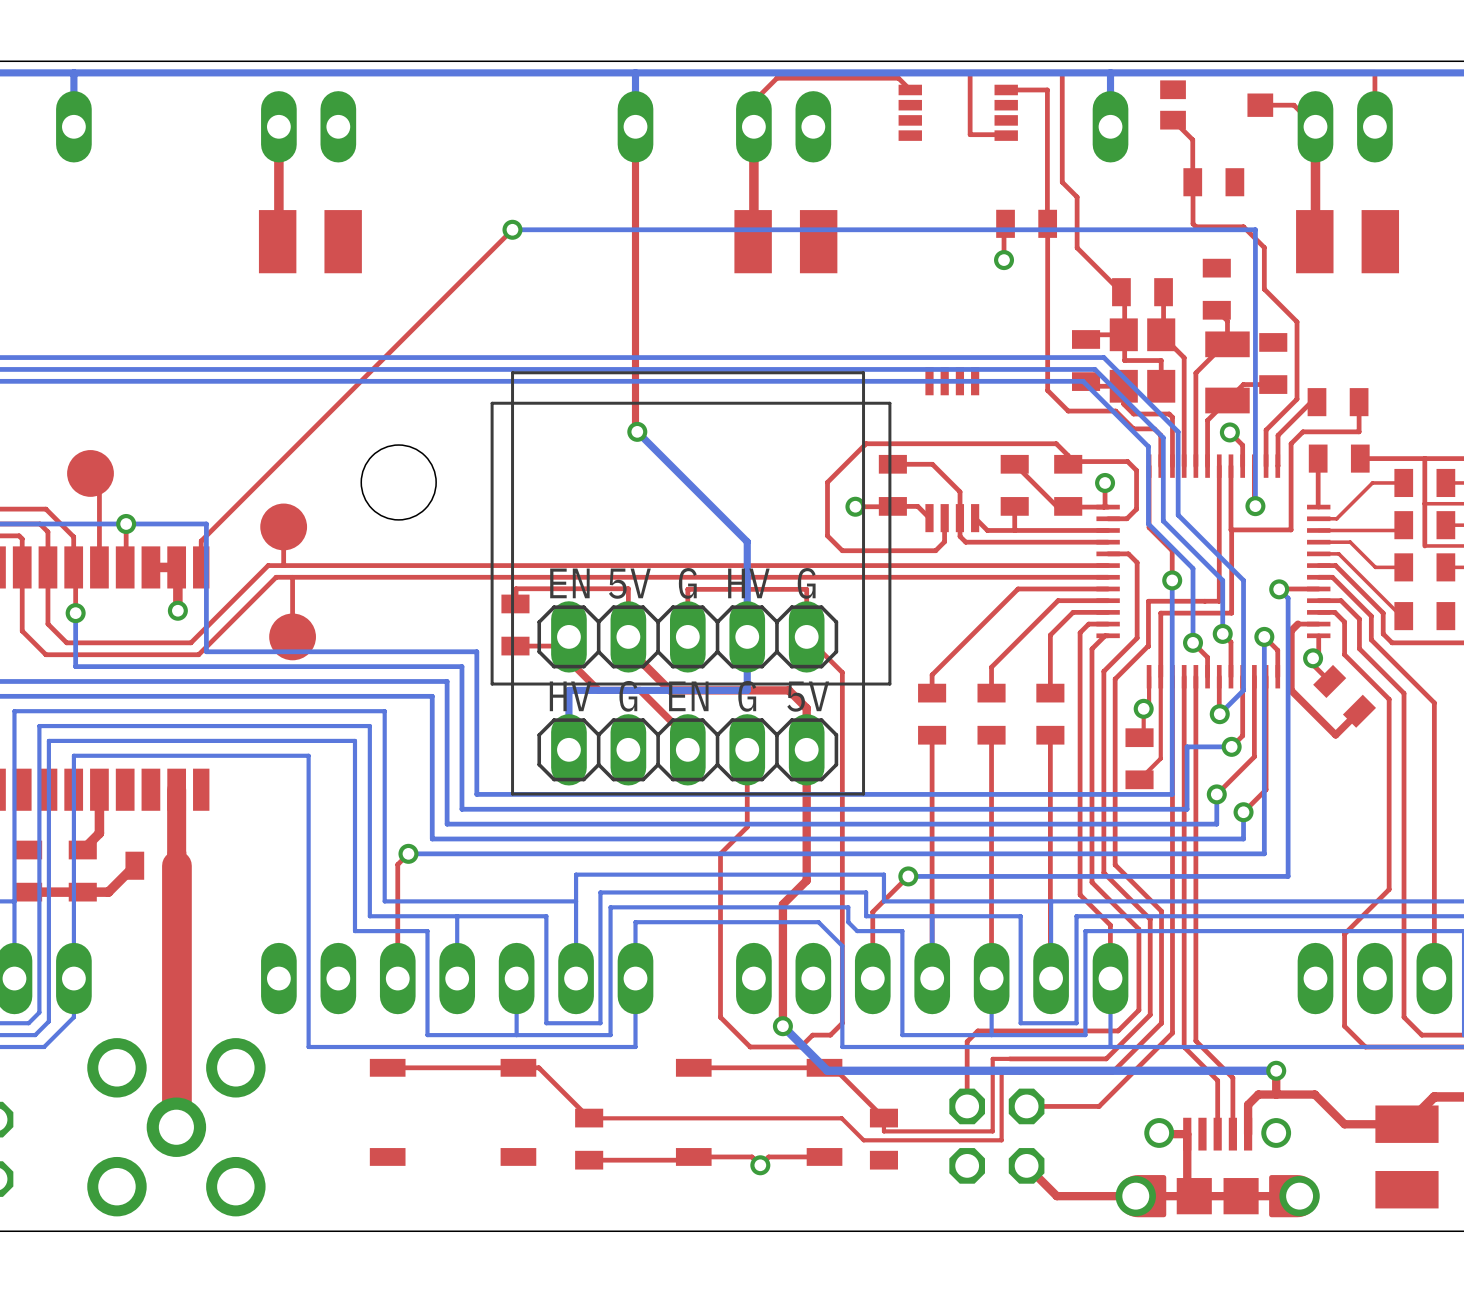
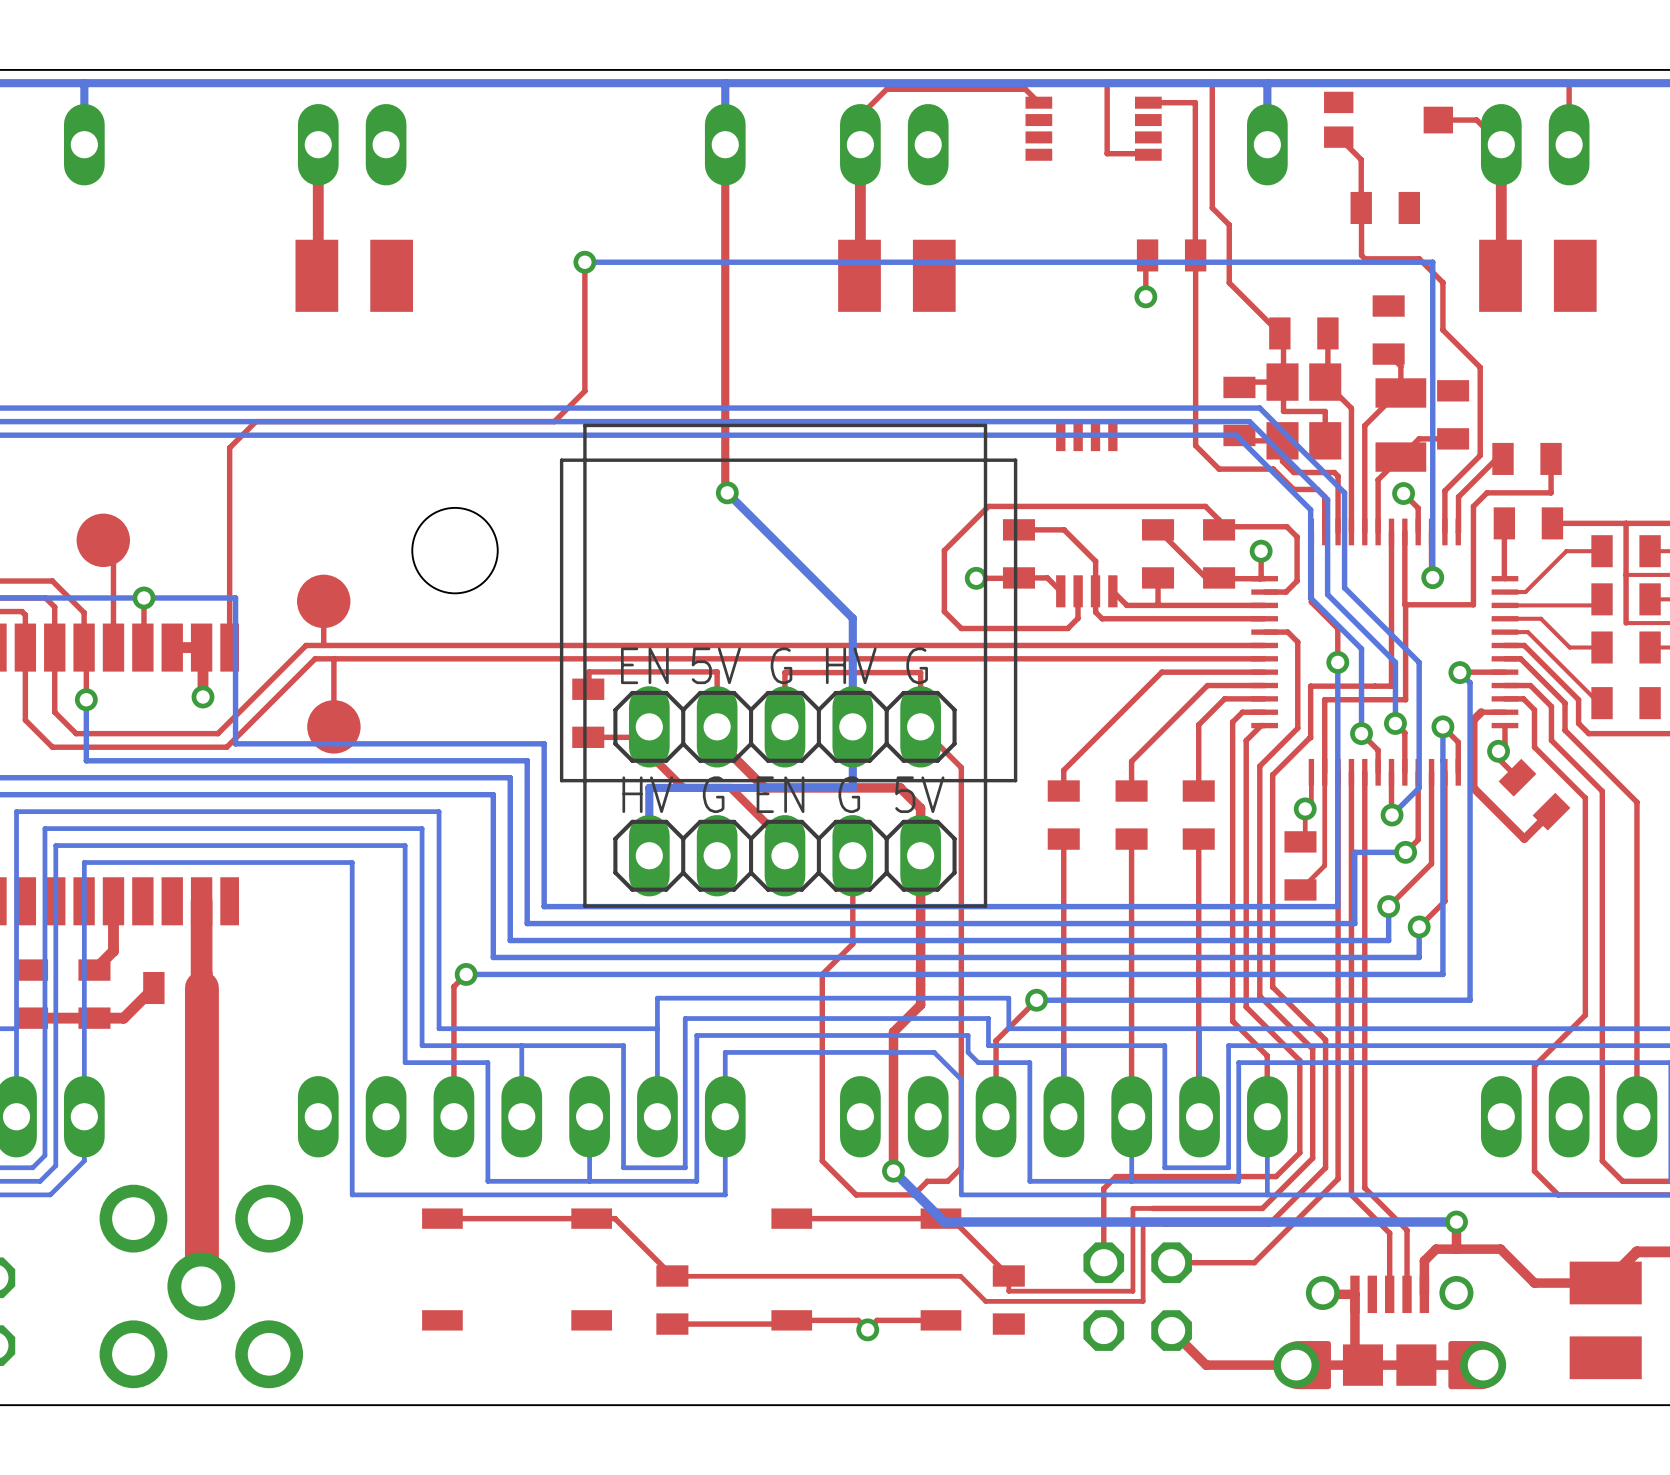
top track: (512, 229) (201, 541) -> (584, 262) (584, 391) (554, 421) (255, 421) (229, 447) (229, 617)

